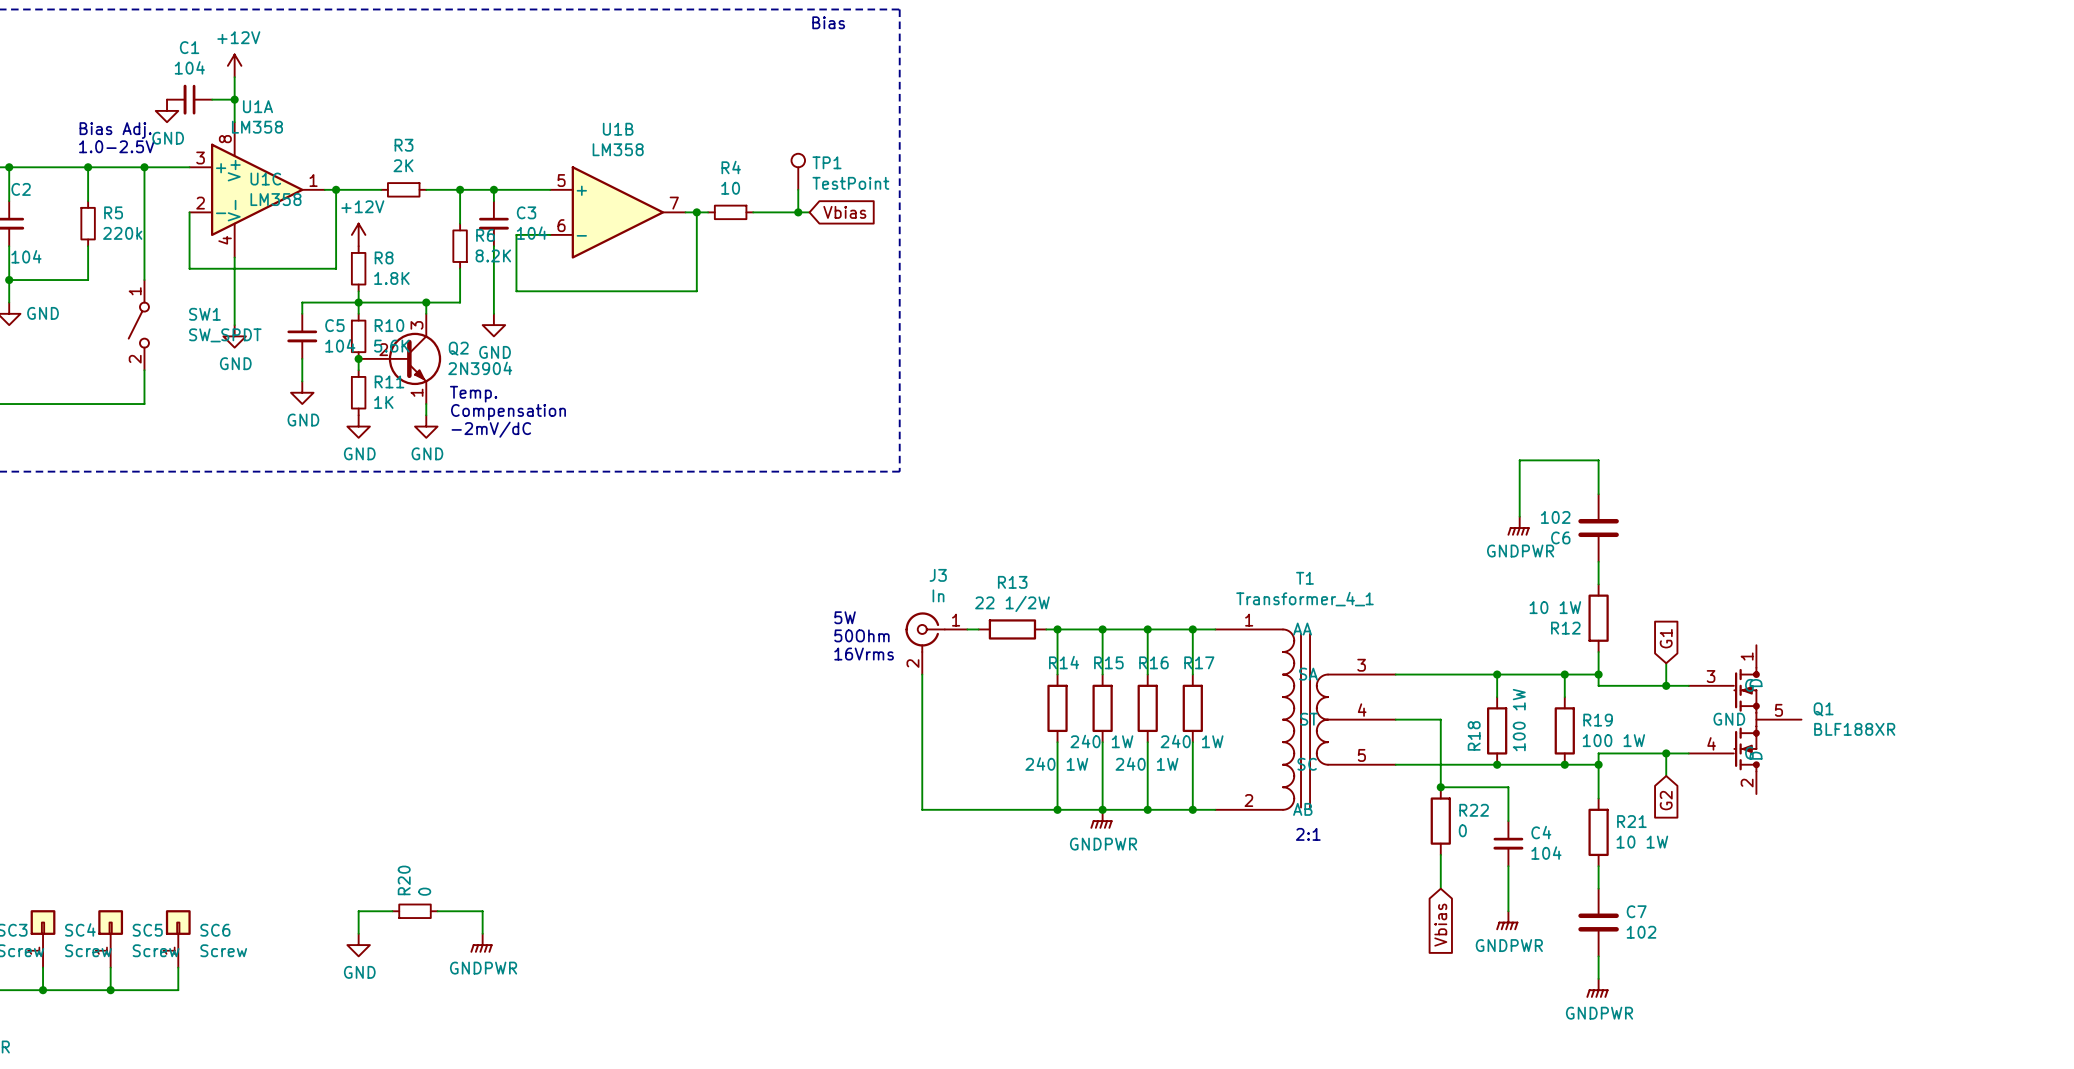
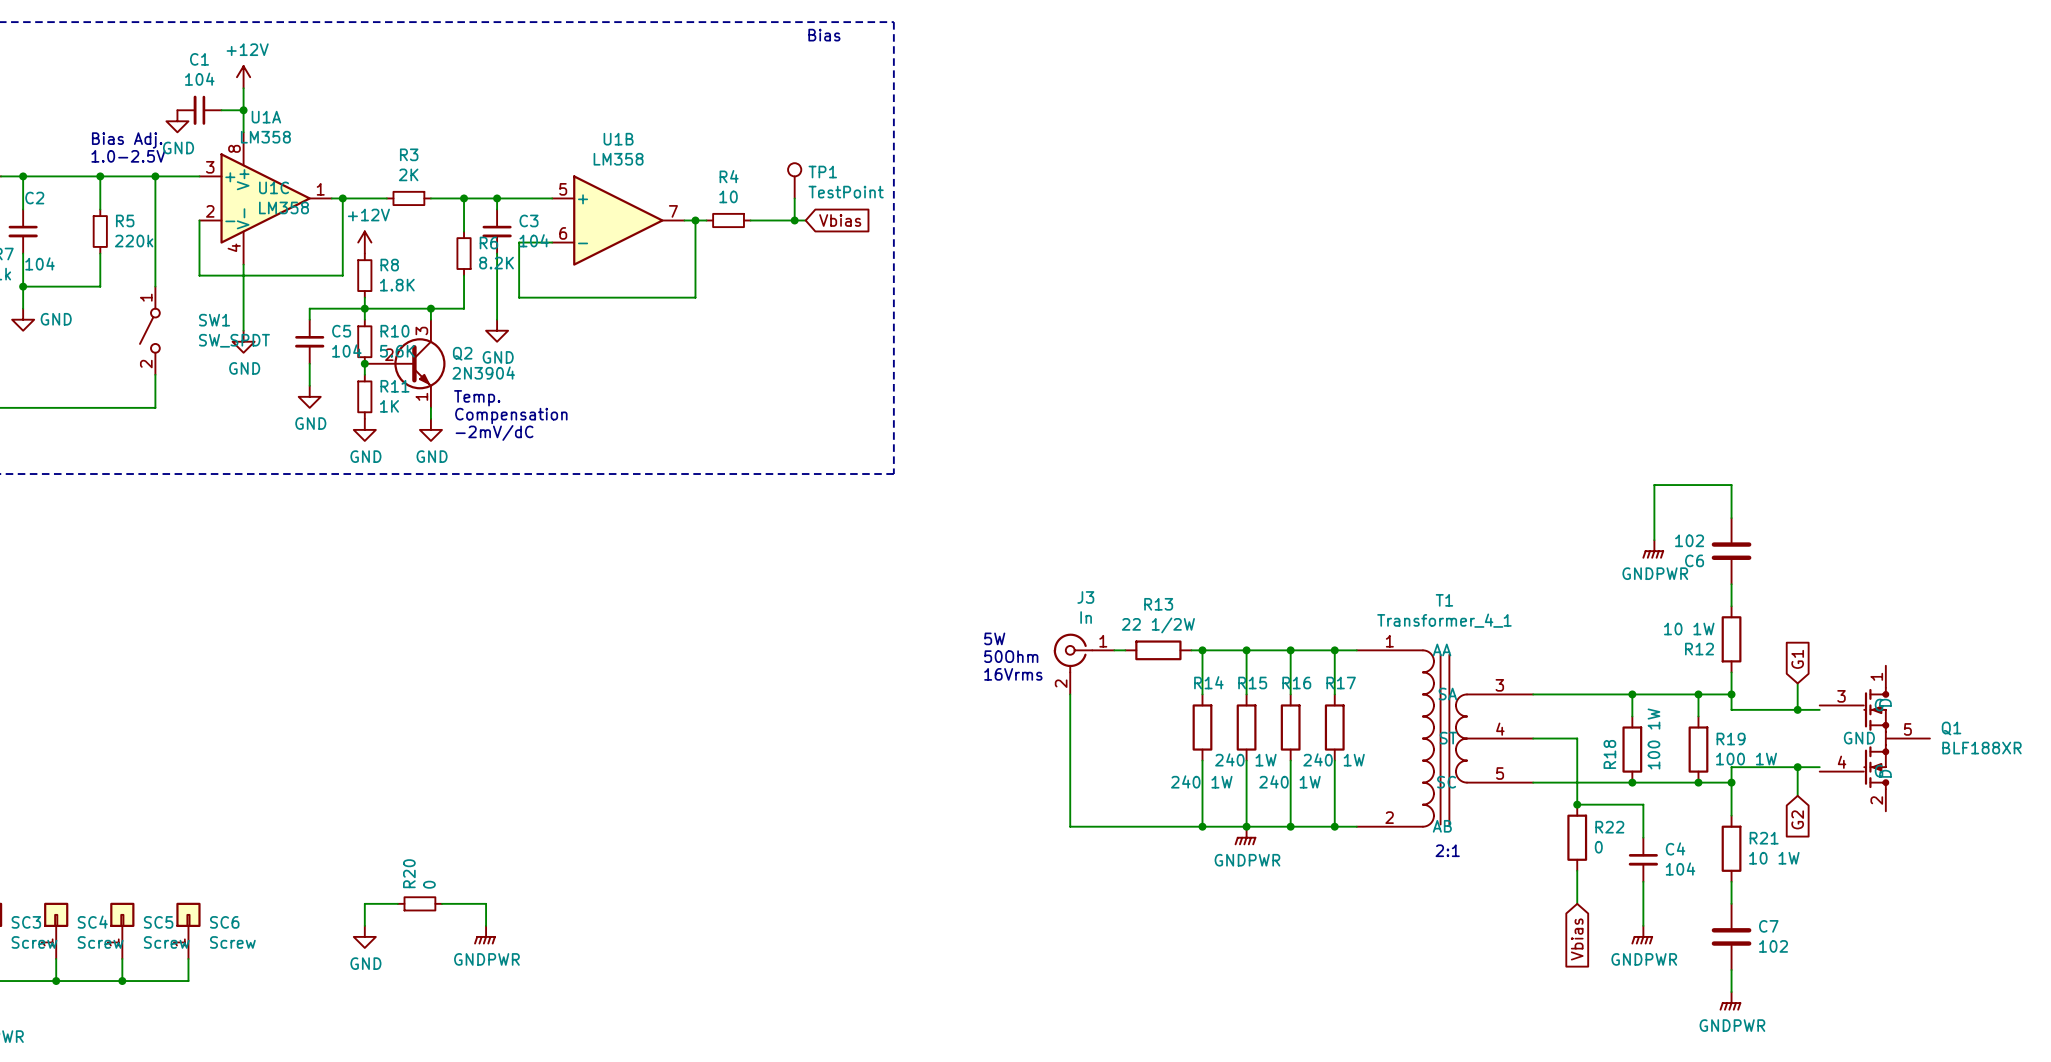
wire: (1598, 494) (1598, 460) (1519, 460) (1519, 516) -> (1731, 518) (1731, 485) (1654, 485) (1654, 540)
power symbol position: GNDPWR (1518, 526) -> GNDPWR (1653, 549)
C6 position: (1598, 528) -> (1731, 551)
wire: (1598, 561) (1598, 584) -> (1731, 584) (1731, 606)
text position: 5W (845, 617) -> 5W (994, 638)
R12 position: (1598, 618) -> (1731, 639)
wire: (967, 629) (978, 629) -> (1114, 650) (1125, 650)
R13 position: (1012, 629) -> (1158, 650)
wire: (1046, 629) (1215, 629) -> (1191, 650) (1356, 650)
wire: (1057, 629) (1057, 674) -> (1202, 650) (1202, 694)
junction: (1057, 629) -> none
wire: (1102, 629) (1102, 674) -> (1246, 650) (1246, 694)
junction: (1102, 629) -> none
wire: (1147, 629) (1147, 674) -> (1290, 650) (1290, 694)
junction: (1147, 629) -> none
wire: (1192, 629) (1192, 674) -> (1334, 650) (1334, 694)
junction position: (1192, 629) -> (1202, 650)
text position: 50Ohm (861, 635) -> 50Ohm (1011, 656)
global label position: G1 (1666, 638) -> G1 (1797, 659)
J3 position: (936, 643) -> (1084, 664)
junction: none -> (1246, 650)
junction: none -> (1290, 650)
junction: none -> (1334, 650)
wire: (1598, 652) (1598, 685) (1688, 685) -> none
text position: 16Vrms (864, 654) -> 16Vrms (1013, 674)
wire: (1666, 663) (1666, 685) -> none
wire: (922, 674) (922, 809) (1215, 809) -> (1070, 694) (1070, 826) (1356, 826)
wire: (1395, 674) (1598, 674) -> (1533, 694) (1731, 694)
wire: (1497, 674) (1497, 697) -> (1632, 694) (1632, 716)
junction: (1497, 674) -> none
wire: (1564, 674) (1564, 697) -> (1698, 694) (1698, 716)
junction: (1564, 674) -> none
junction: (1598, 674) -> none
wire: none -> (1731, 672) (1731, 709) (1819, 709)
junction position: (1666, 685) -> (1632, 694)
wire: none -> (1797, 683) (1797, 709)
junction: none -> (1698, 694)
junction: none -> (1731, 694)
R14 position: (1057, 708) -> (1202, 727)
R15 position: (1102, 708) -> (1246, 727)
R16 position: (1147, 708) -> (1290, 727)
R17 position: (1192, 708) -> (1334, 727)
junction: none -> (1797, 709)
T1 position: (1305, 719) -> (1444, 738)
wire: (1395, 719) (1440, 719) (1440, 787) (1508, 787) (1508, 821) -> none
Q1 position: (1745, 719) -> (1874, 738)
R18 position: (1497, 730) -> (1632, 749)
R19 position: (1564, 730) -> (1698, 749)
wire: (1057, 742) (1057, 809) -> (1202, 760) (1202, 826)
wire: (1102, 742) (1102, 809) -> (1246, 760) (1246, 826)
wire: (1147, 742) (1147, 809) -> (1290, 760) (1290, 826)
wire: (1192, 742) (1192, 809) -> (1334, 760) (1334, 826)
wire: (1598, 753) (1688, 753) -> (1577, 749) (1577, 738) (1533, 738)
junction: (1666, 753) -> none
wire: (1395, 764) (1598, 764) -> (1533, 782) (1731, 782)
junction: (1497, 764) -> none
junction: (1564, 764) -> none
junction: (1598, 764) -> none
wire: none -> (1797, 767) (1797, 795)
junction: none -> (1797, 767)
wire: none -> (1819, 767) (1731, 767) (1731, 815)
junction: (1440, 787) -> none
junction: none -> (1632, 782)
junction: none -> (1698, 782)
junction: none -> (1731, 782)
wire: none -> (1577, 793) (1577, 804) (1643, 804) (1643, 837)
global label position: G2 (1666, 800) -> G2 (1797, 819)
junction: (1057, 809) -> none
junction: (1102, 809) -> none
junction: (1147, 809) -> none
junction position: (1192, 809) -> (1202, 826)
junction: none -> (1577, 804)
power symbol: GNDPWR (1101, 819) -> none
R22 position: (1440, 821) -> (1577, 837)
junction: none -> (1246, 826)
junction: none -> (1290, 826)
junction: none -> (1334, 826)
R21 position: (1598, 832) -> (1731, 848)
text position: 2:1 (1308, 834) -> 2:1 (1447, 850)
power symbol: none -> GNDPWR (1245, 835)
C4 position: (1508, 843) -> (1643, 859)
wire: (1440, 854) (1440, 888) -> none
wire: (1508, 866) (1508, 911) -> (1643, 881) (1643, 925)
wire: none -> (1731, 881) (1731, 903)
power symbol: GNDPWR (1507, 920) -> none
C7 position: (1598, 922) -> (1731, 936)
global label position: Vbias (1440, 925) -> Vbias (1577, 939)
power symbol: none -> GNDPWR (1642, 935)
wire: (1598, 956) (1598, 978) -> (1731, 969) (1731, 992)
power symbol: GNDPWR (1597, 988) -> none
power symbol: none -> GNDPWR (1730, 1001)

